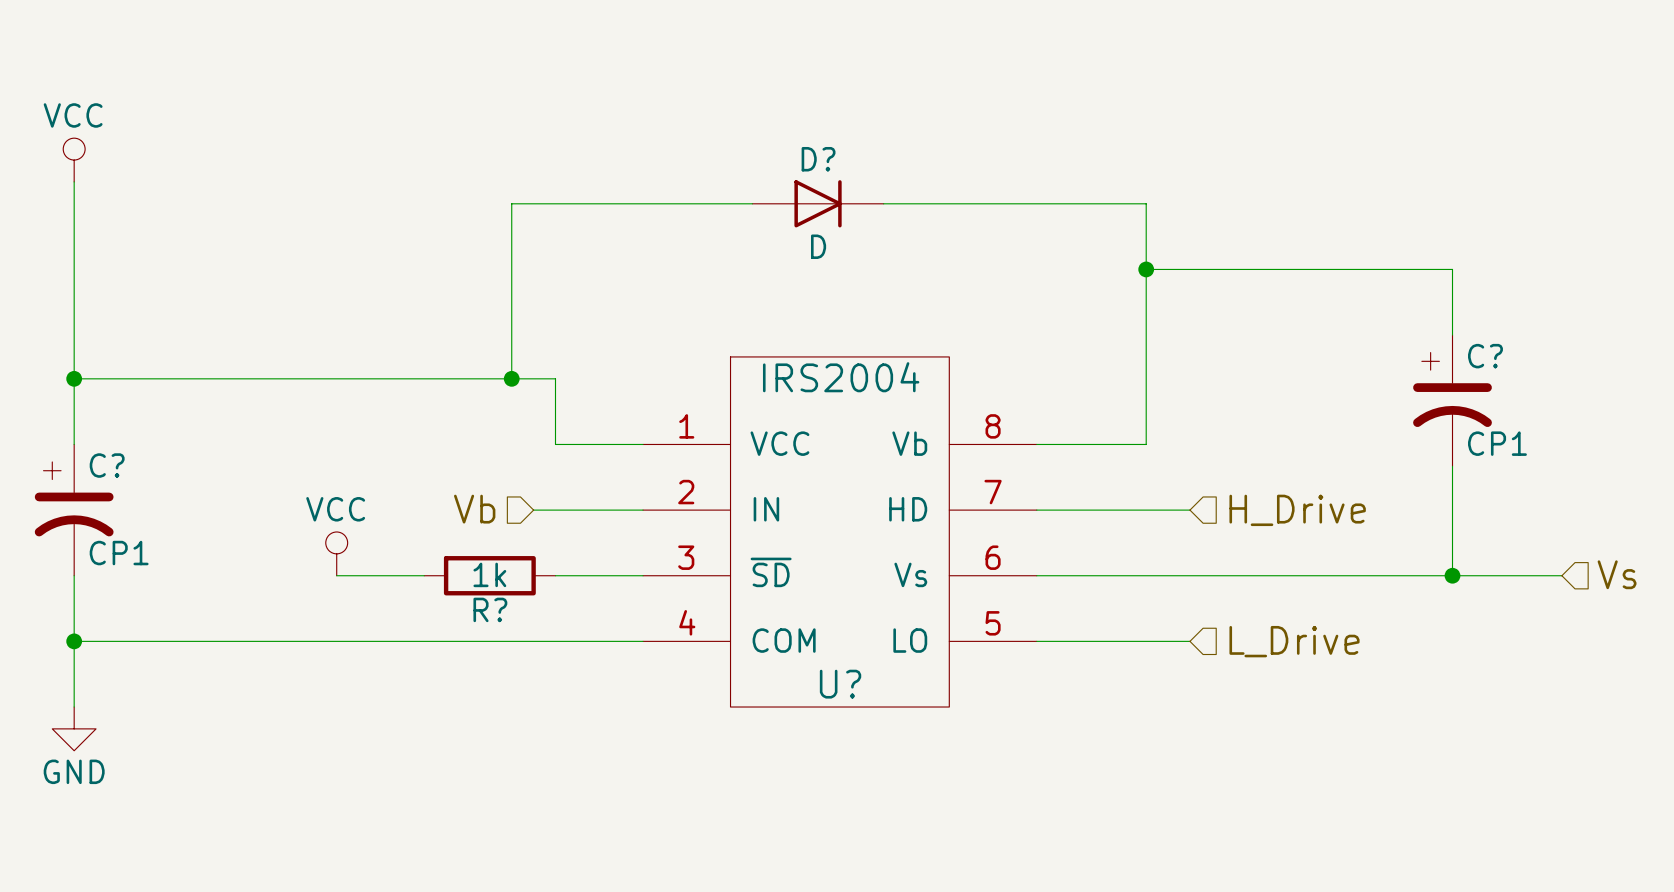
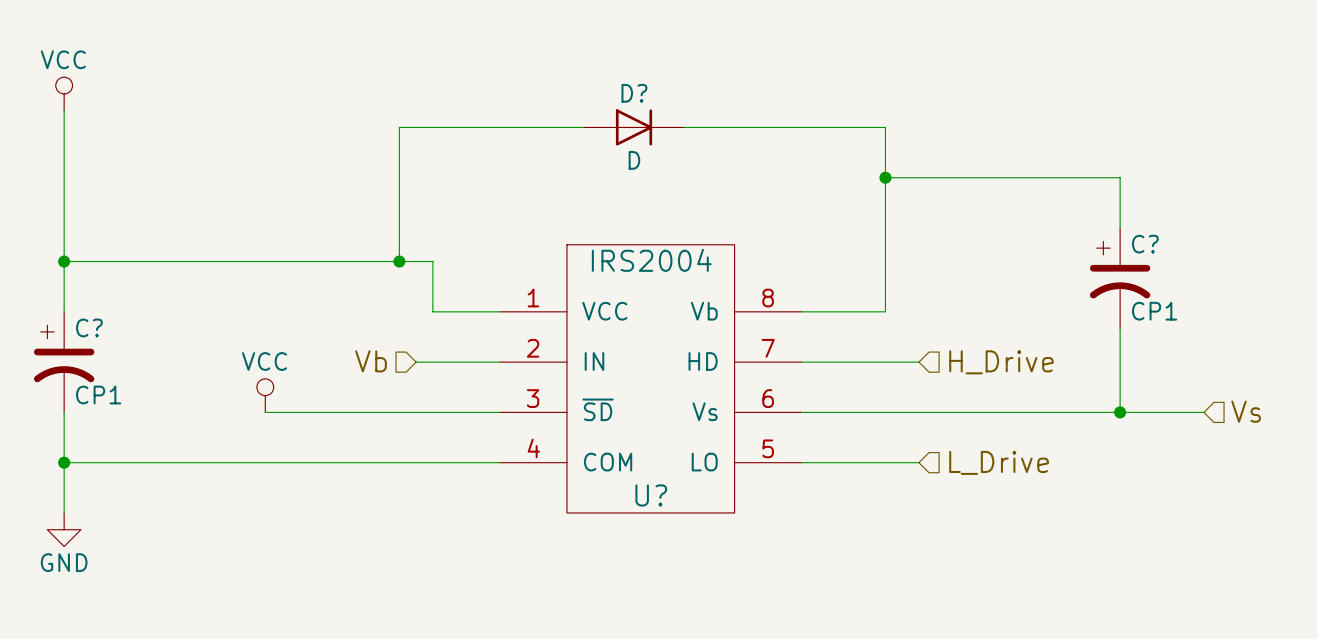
wire: none -> (332, 412) (432, 412)
R?: 1k (489, 575) -> none

